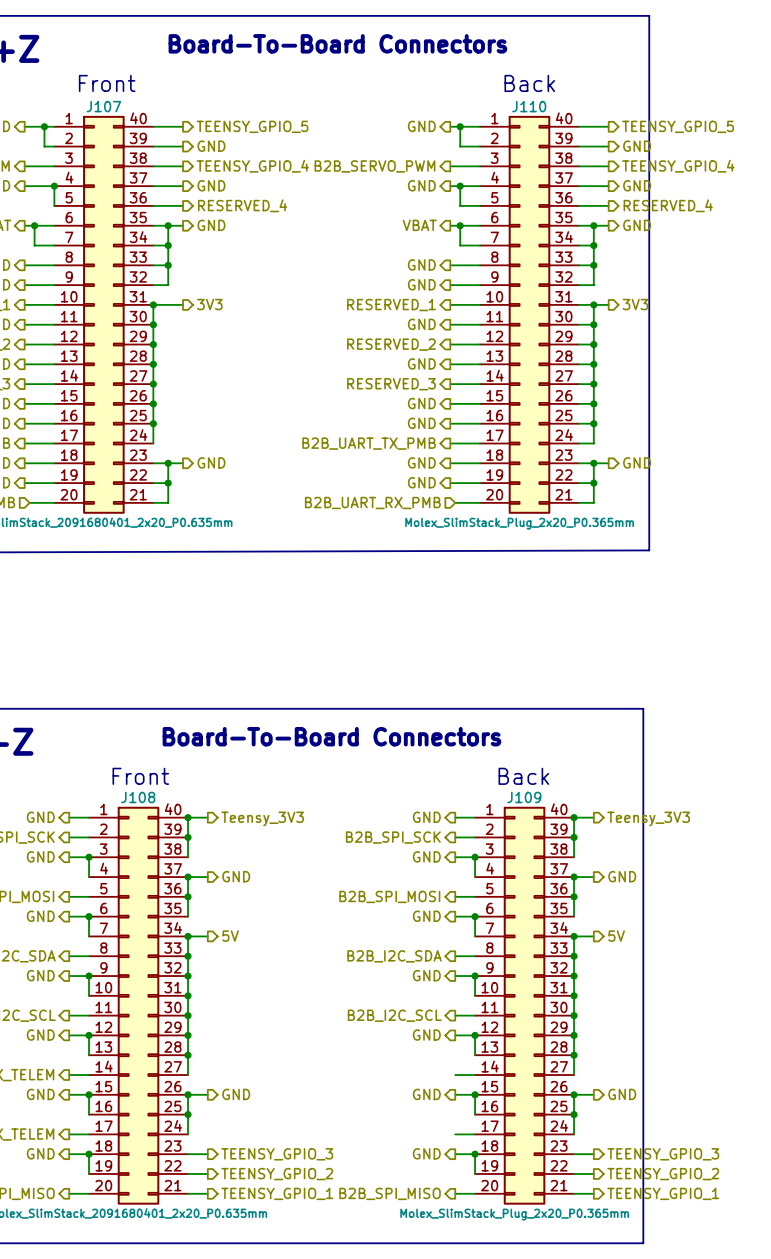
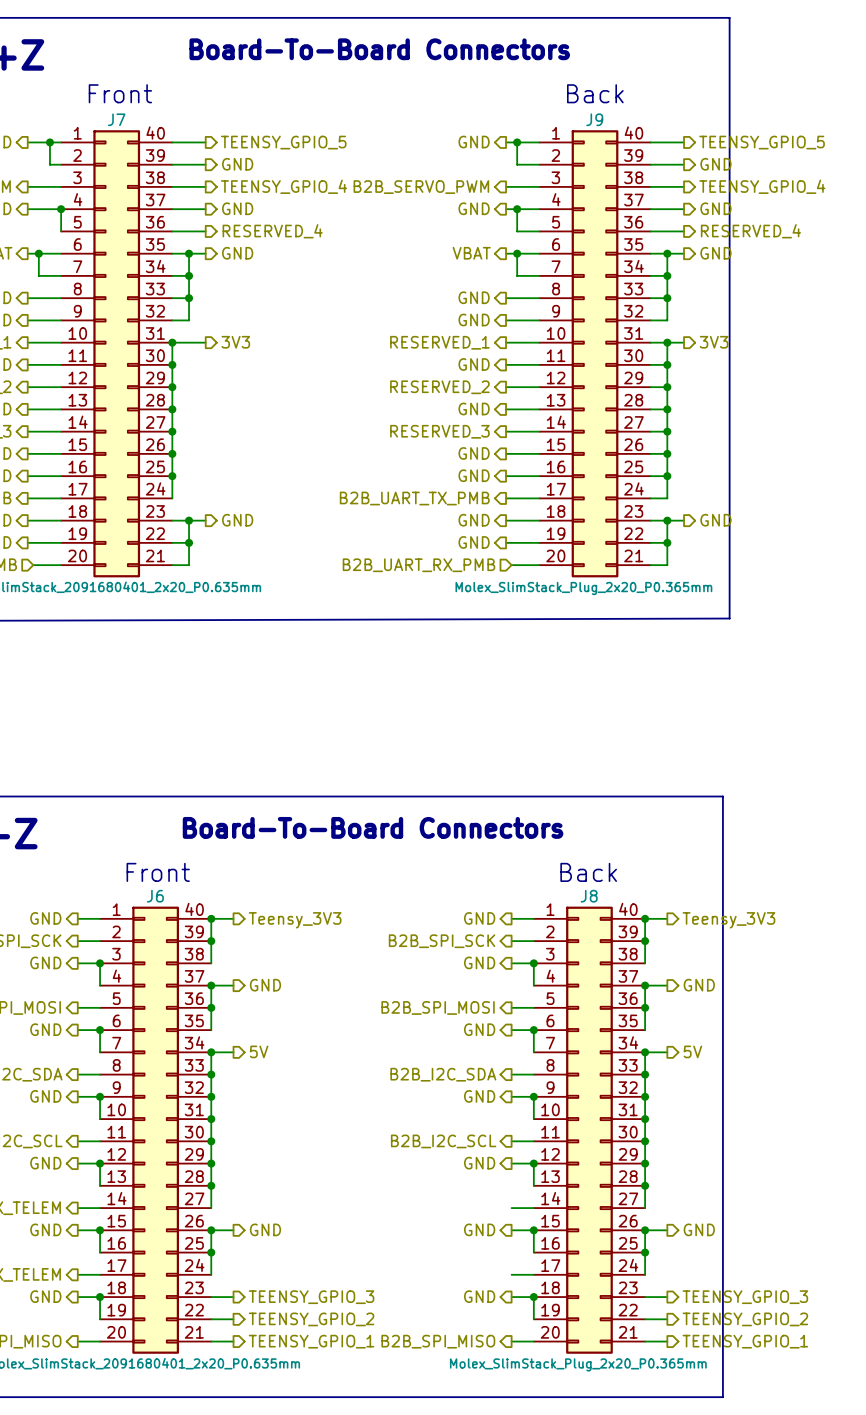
J107 name: J107 (103, 106) -> J7 (116, 119)
J110 name: J110 (529, 106) -> J9 (594, 119)
J108 name: J108 (138, 797) -> J6 (155, 896)
J109 name: J109 (524, 797) -> J8 (589, 896)

